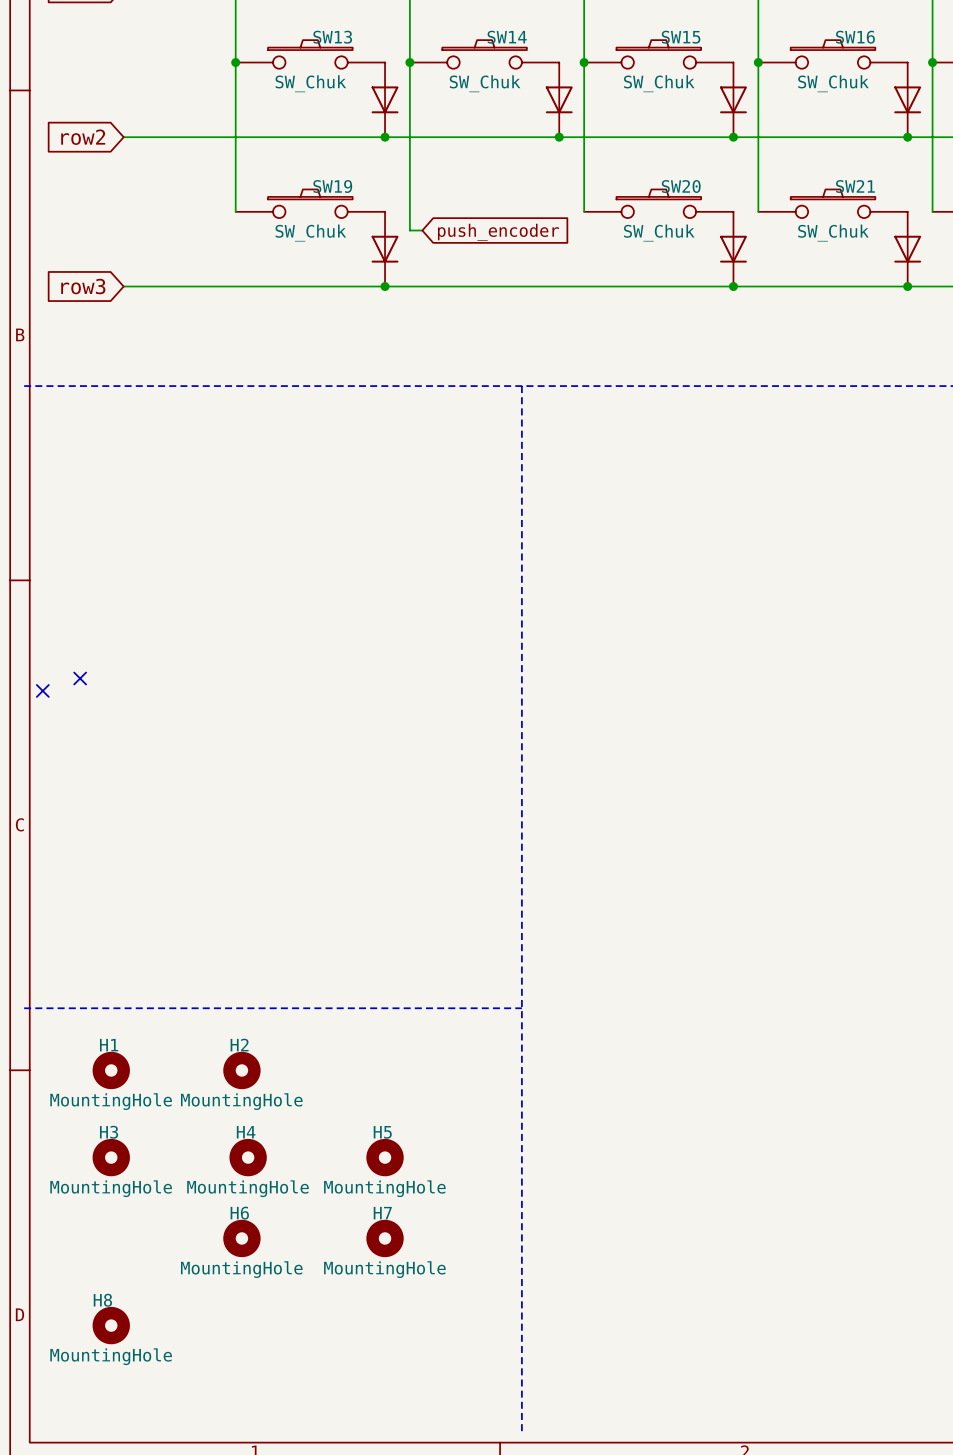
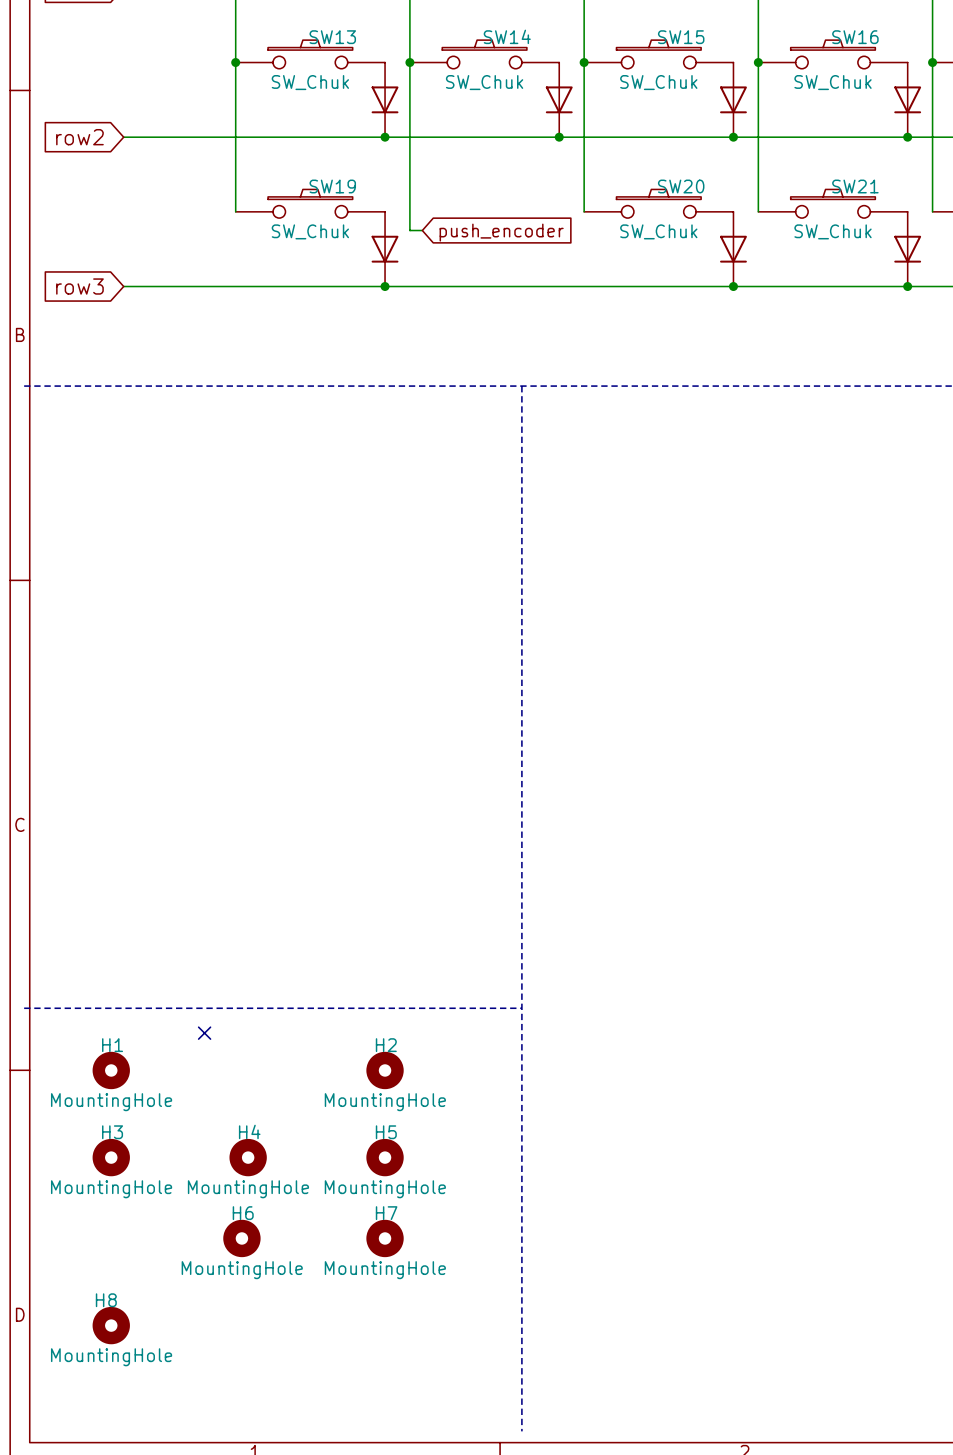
no-connect mark: (80, 678) -> none
no-connect mark: (42, 690) -> none
no-connect mark: none -> (204, 1033)
H2 position: (241, 1070) -> (385, 1070)

